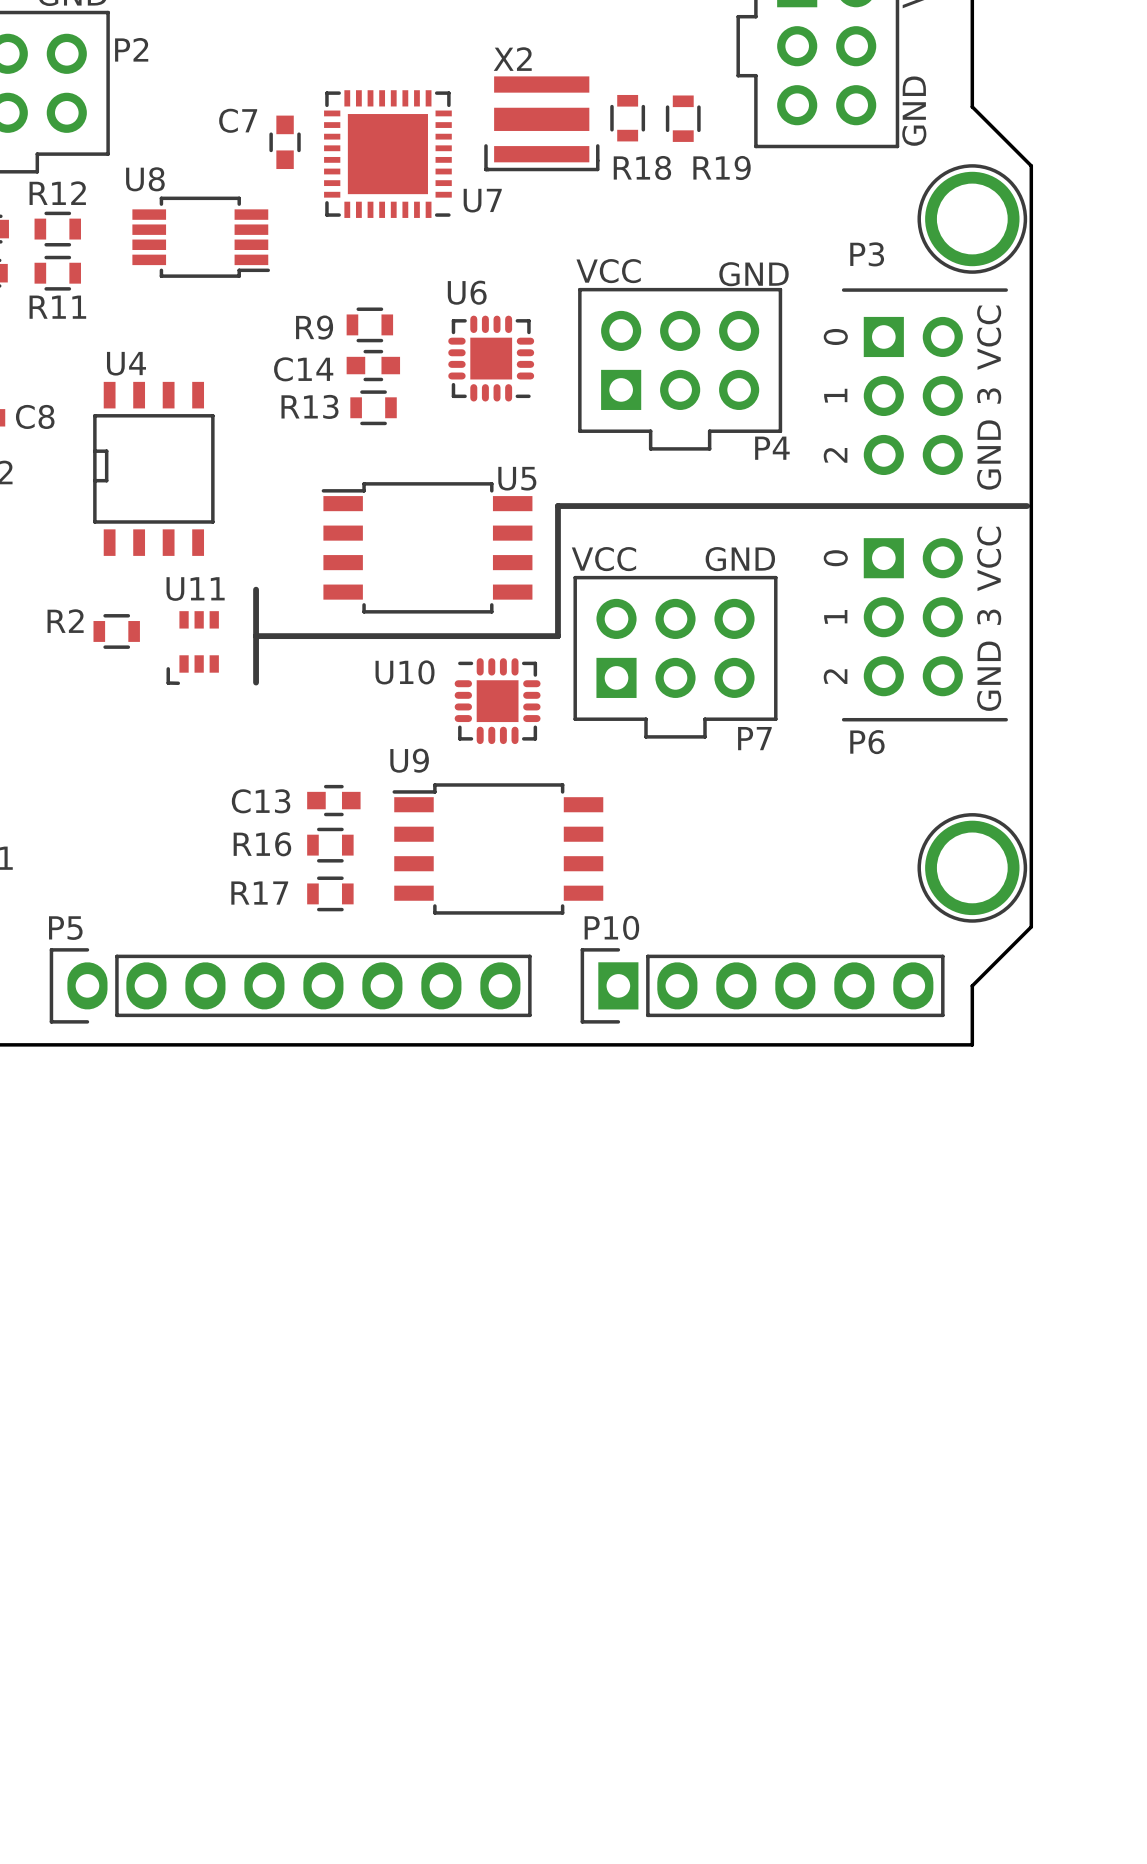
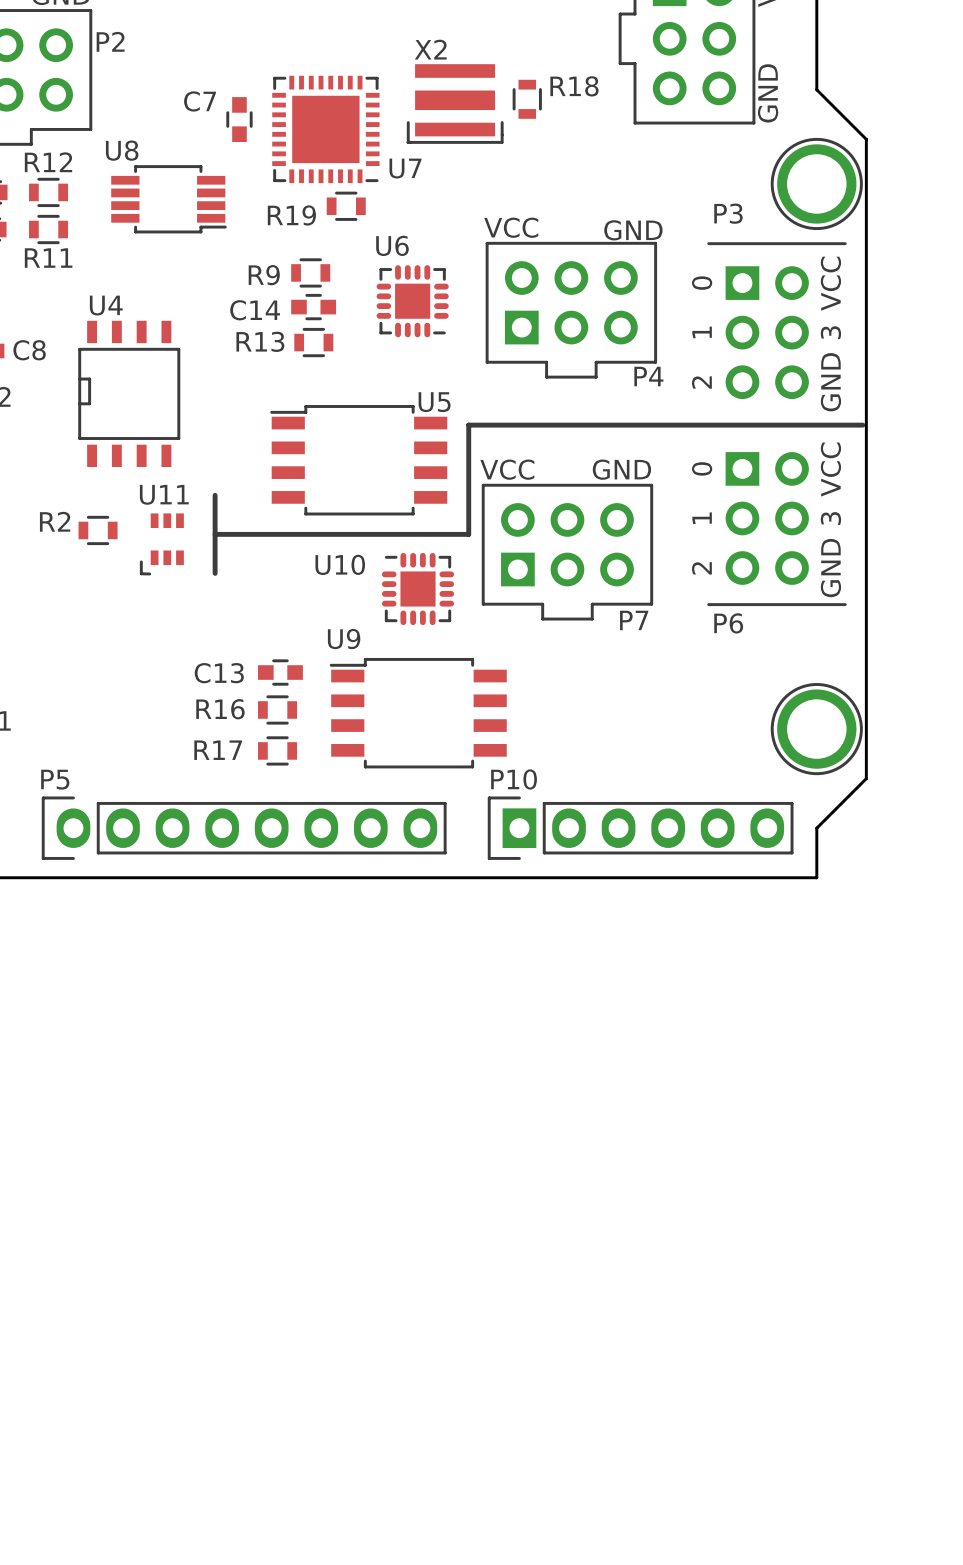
R19 rotation: 0° (683, 118) -> 90° clockwise (346, 206)
R19 position: (683, 118) -> (346, 206)
R18 name position: R18 (642, 168) -> R18 (574, 86)

